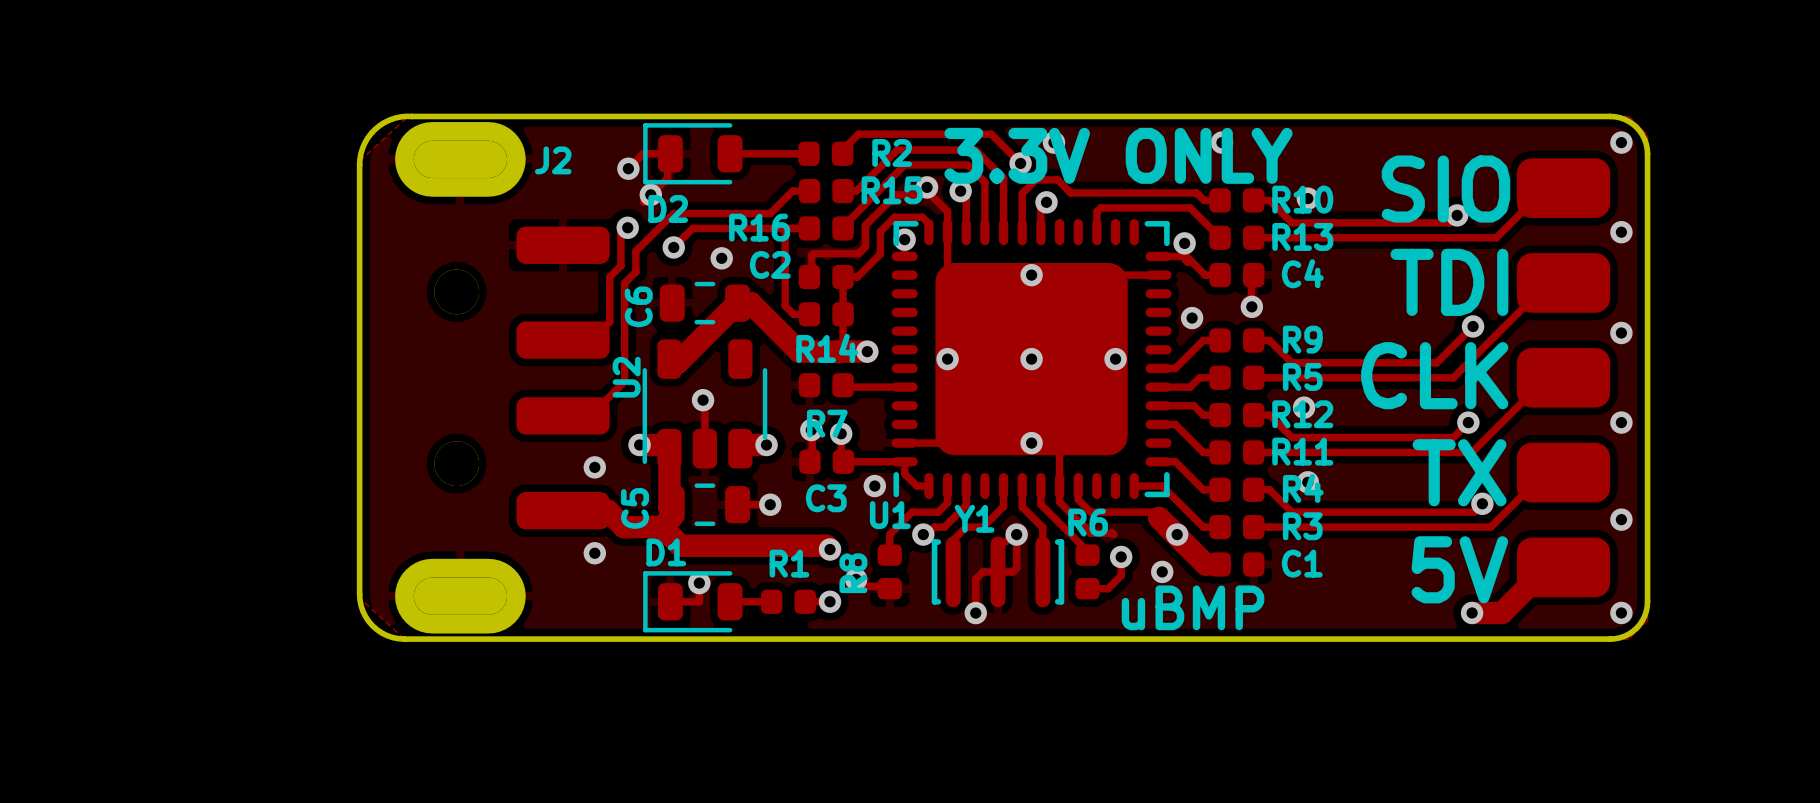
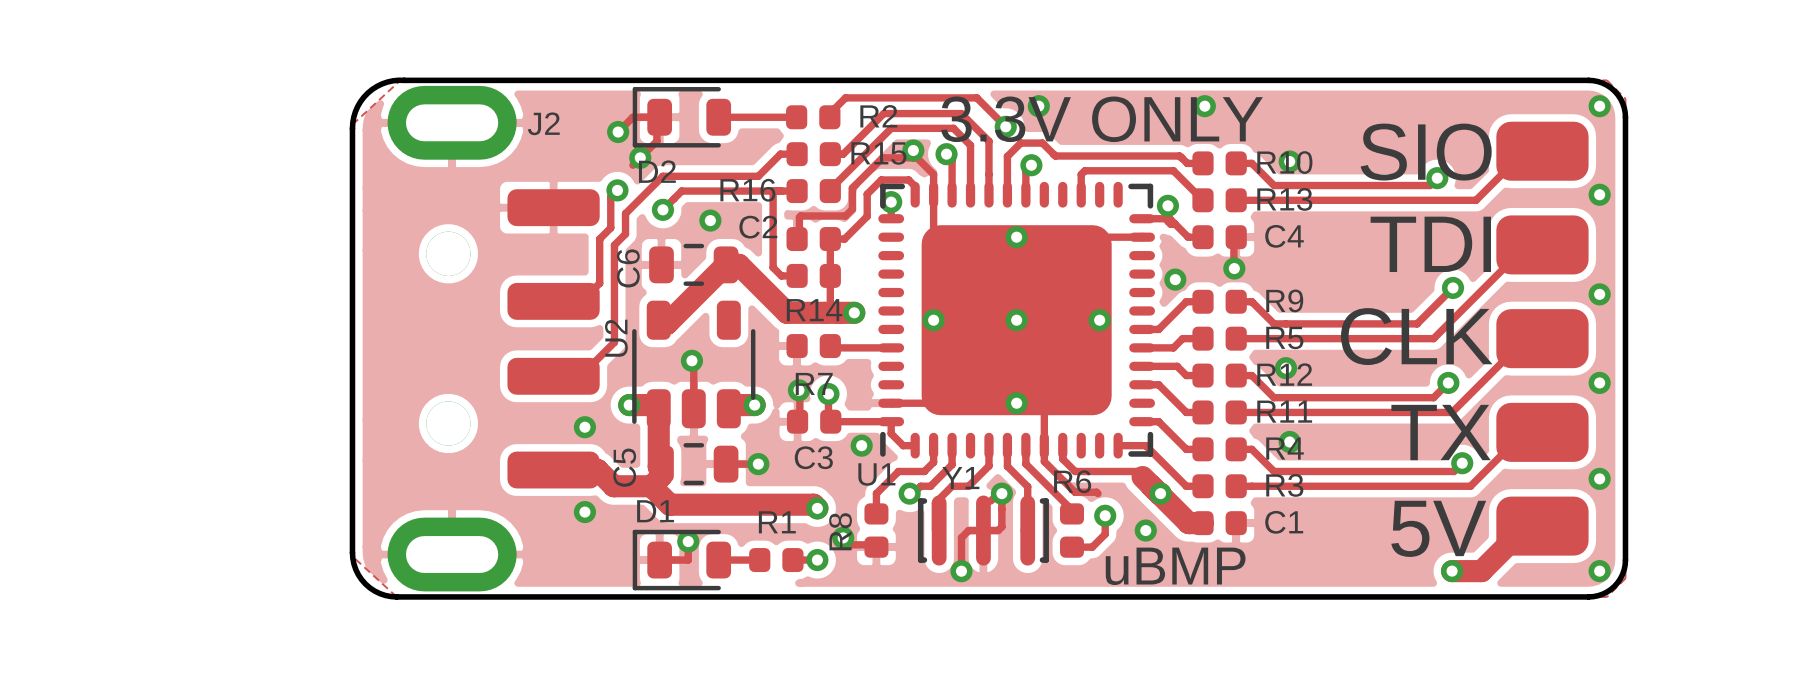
board edge: (432, 159) (488, 159) -> none
board edge: (432, 596) (488, 596) -> none

